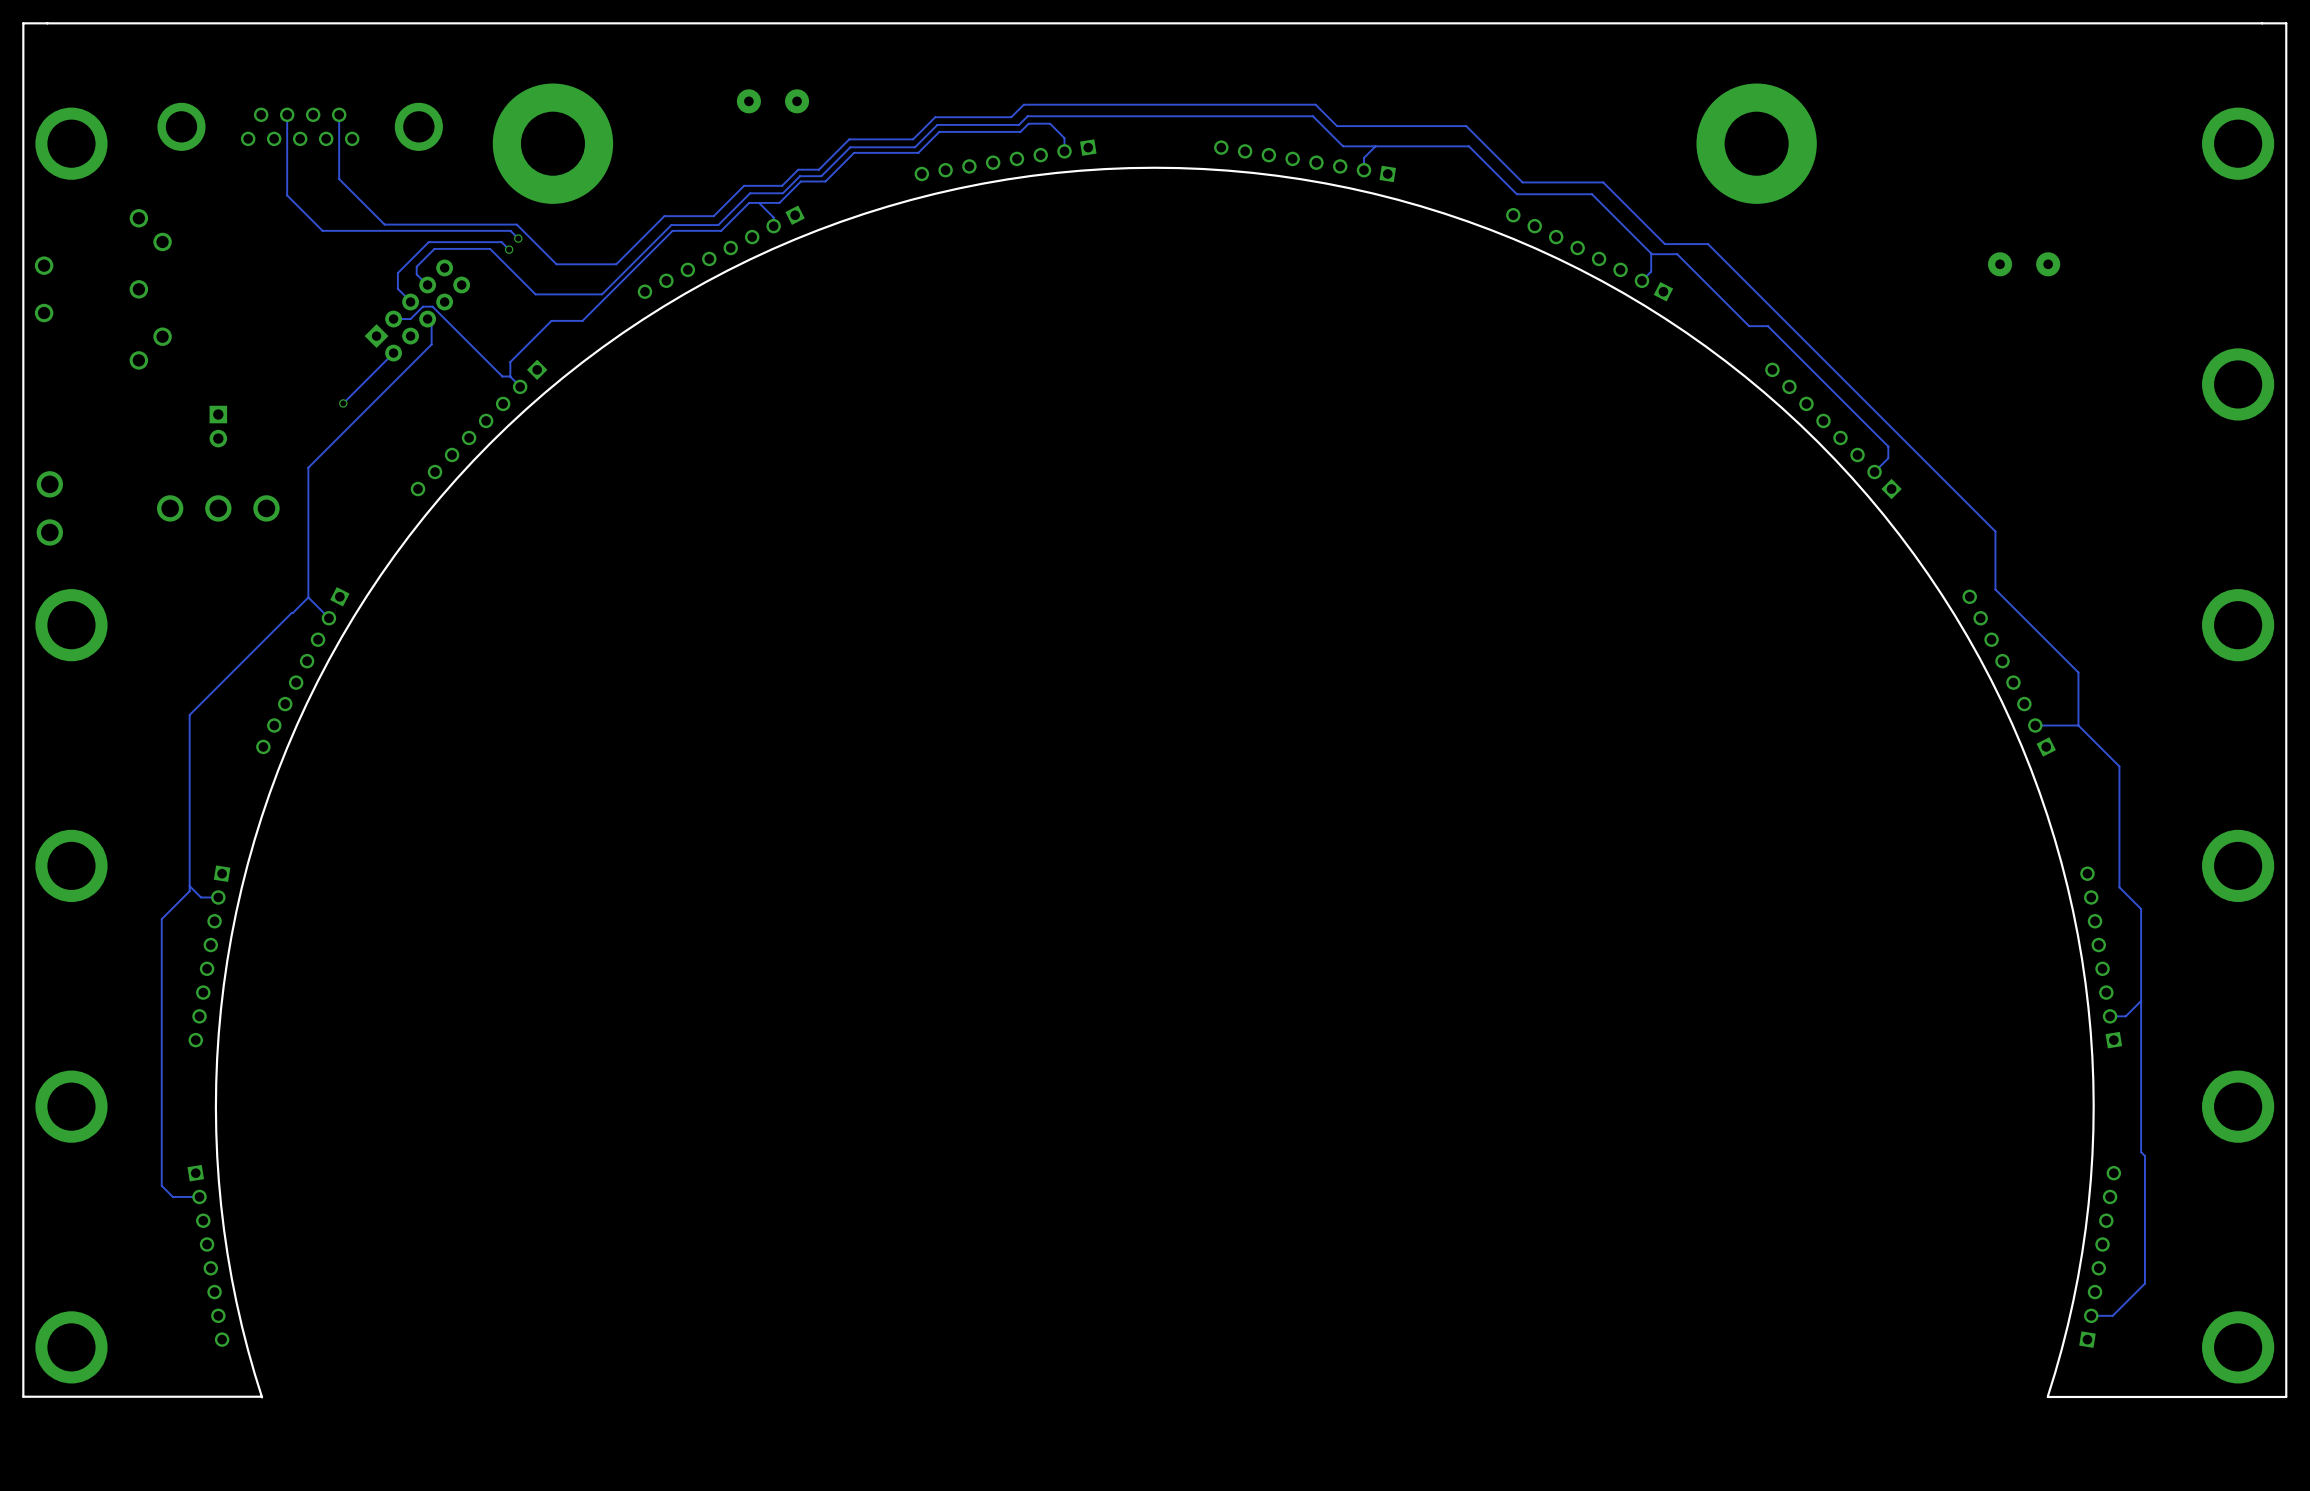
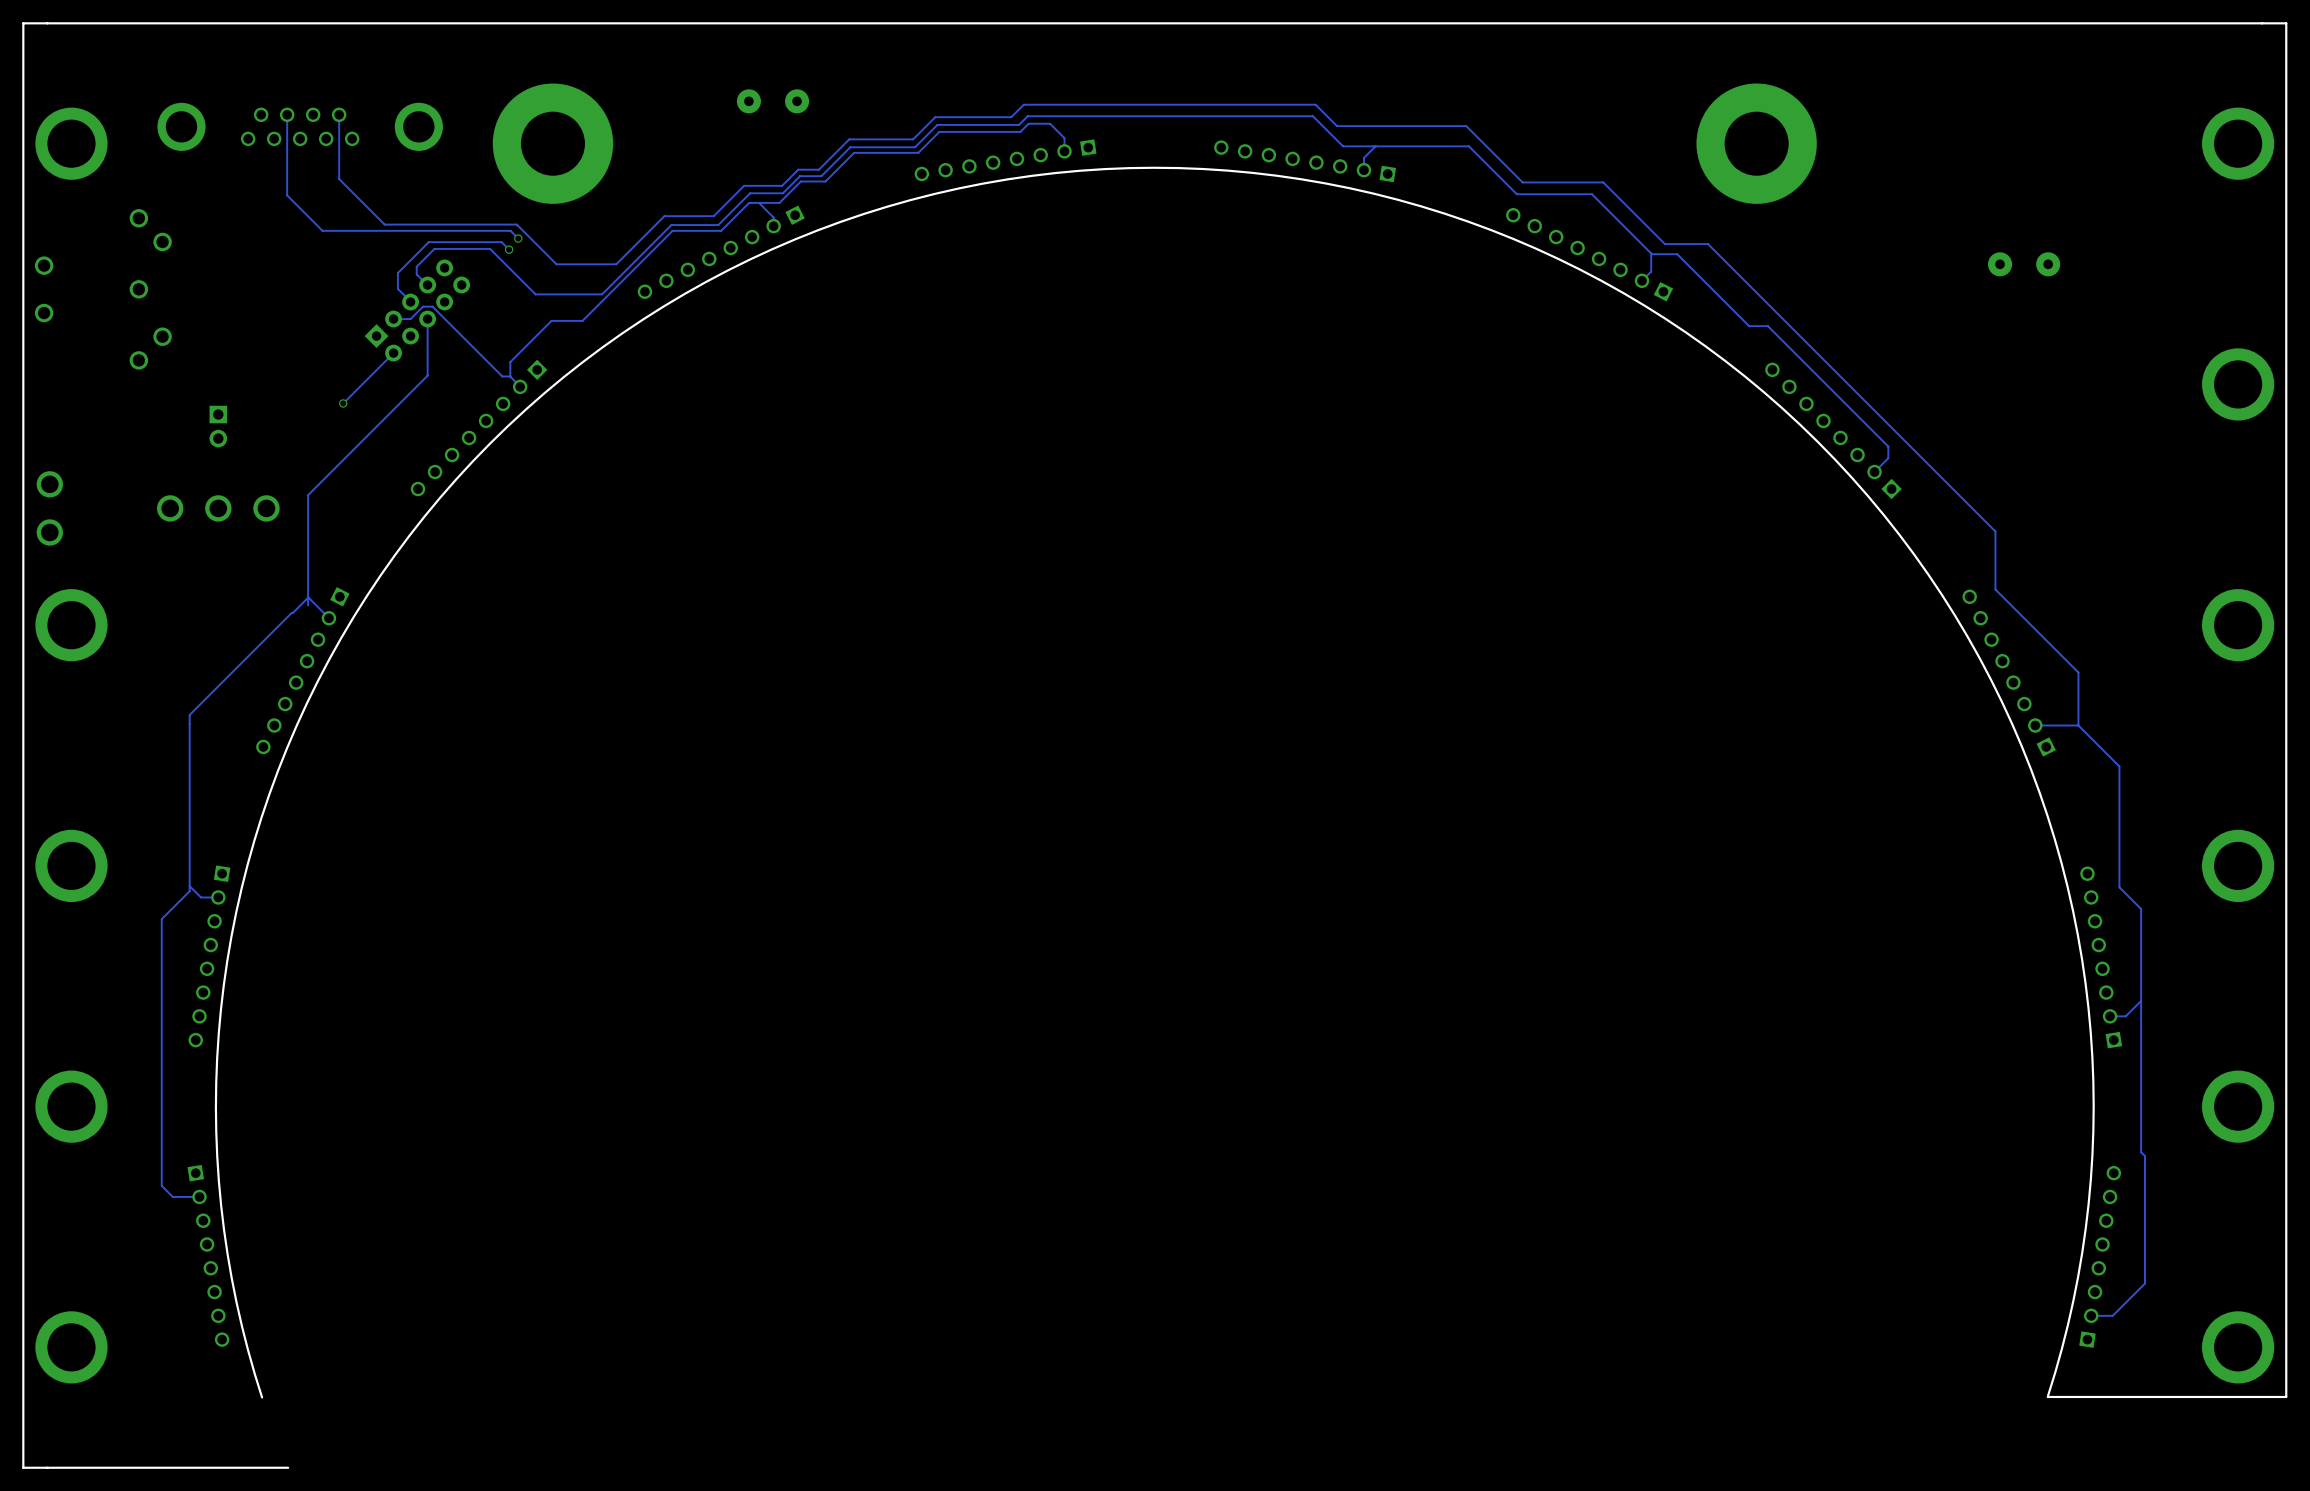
track: (427, 319) (431, 323) (431, 344) (308, 467) (308, 597) -> (427, 319) (427, 375) (308, 495) (308, 605)
board edge: (261, 1396) (23, 1396) -> (288, 1467) (23, 1467) (23, 1396)

